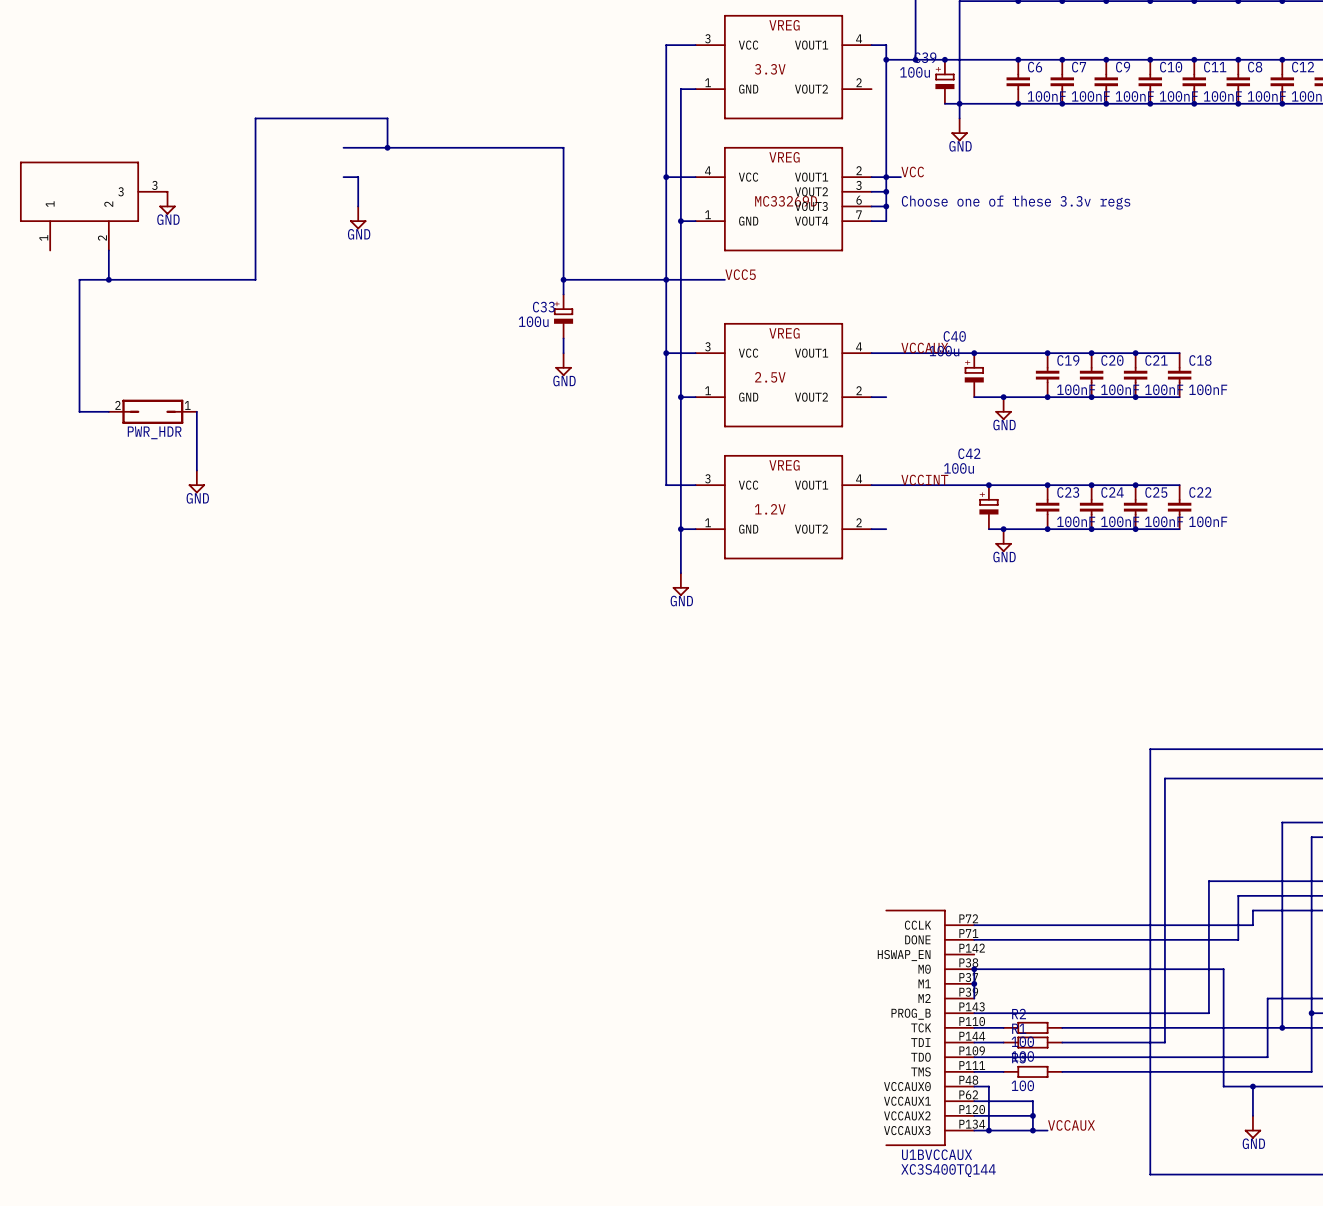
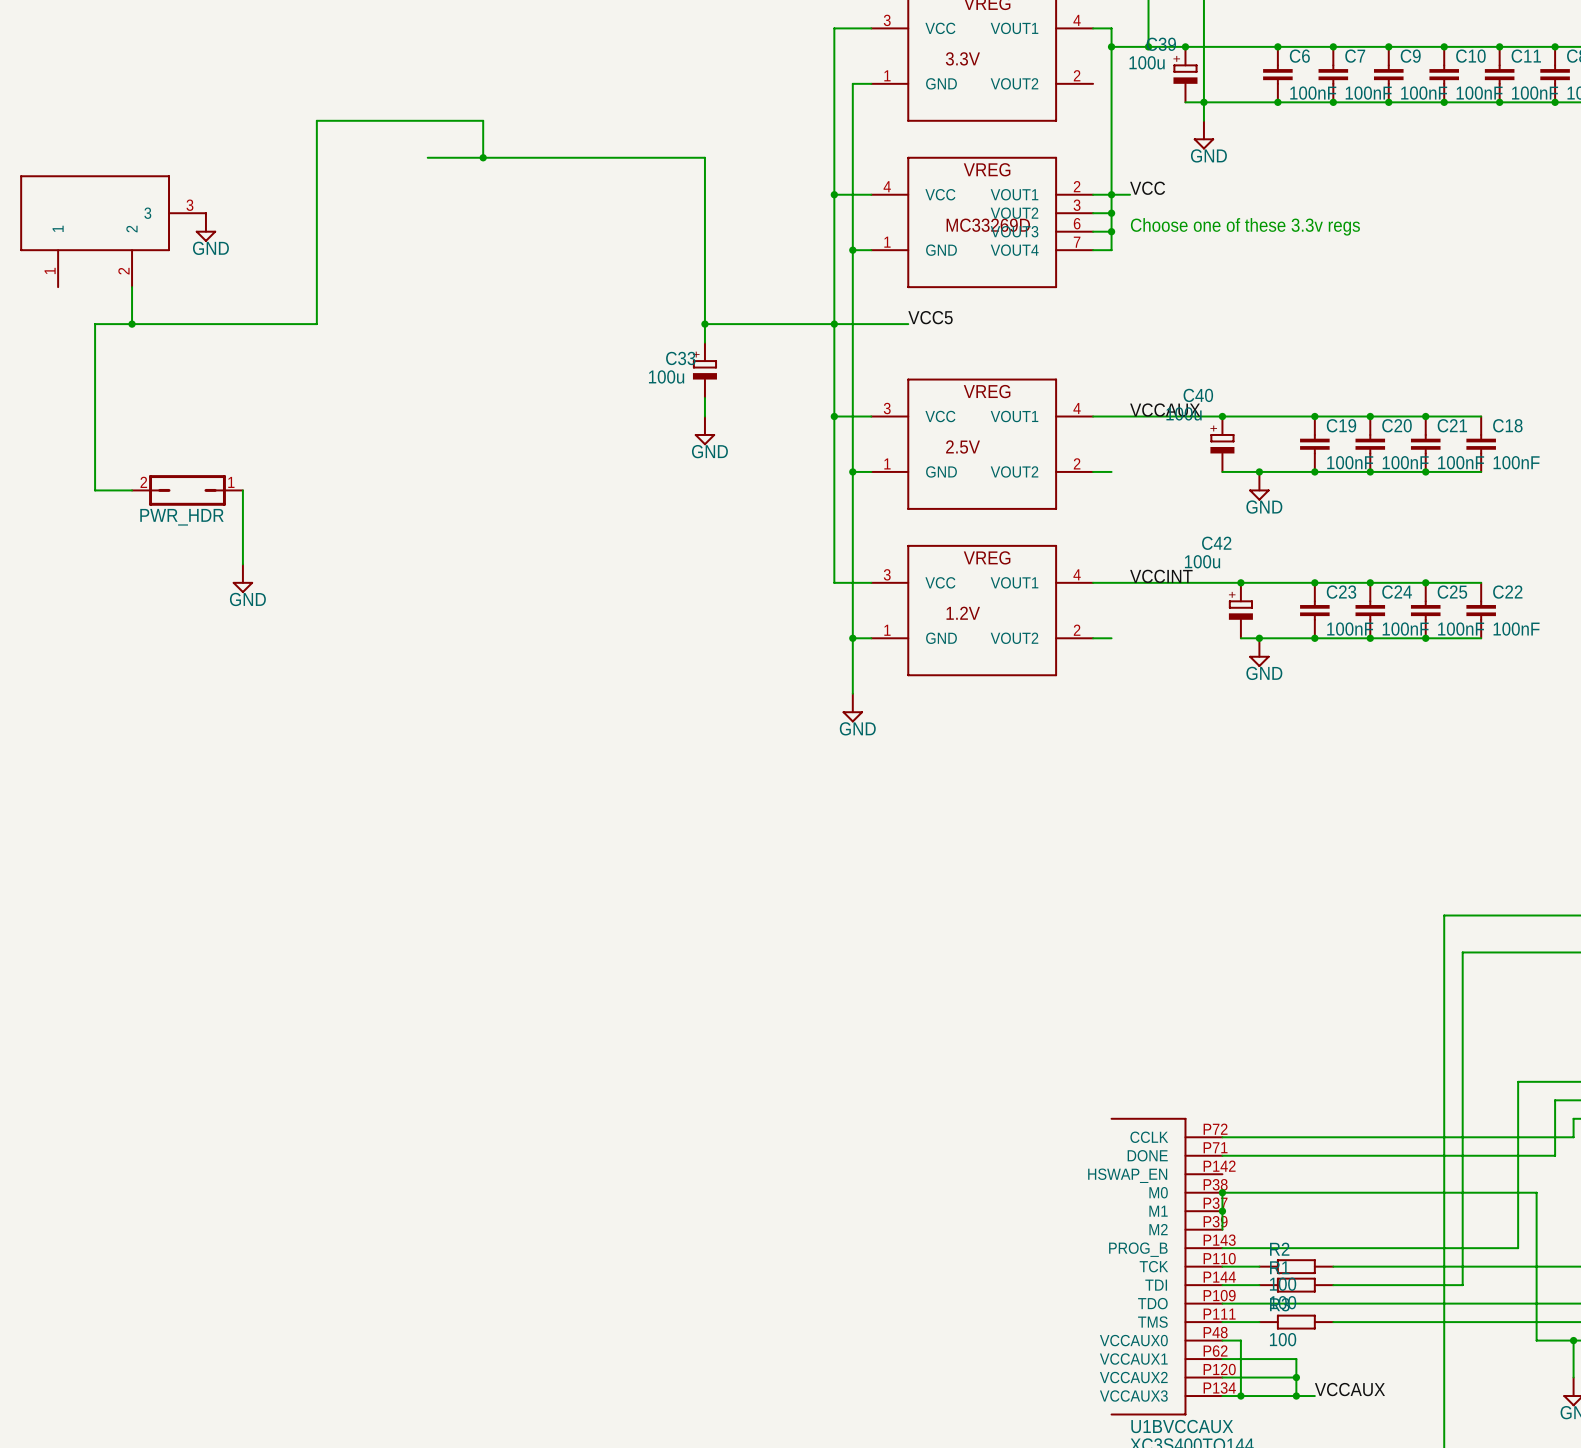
wire: (343, 177) (358, 177) (358, 206) -> none
power symbol: GND (358, 217) -> none

